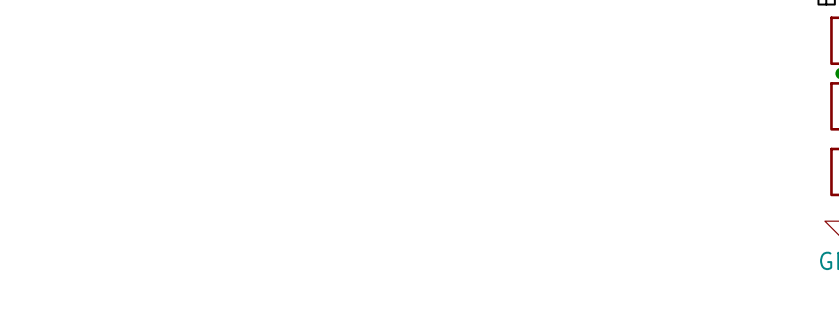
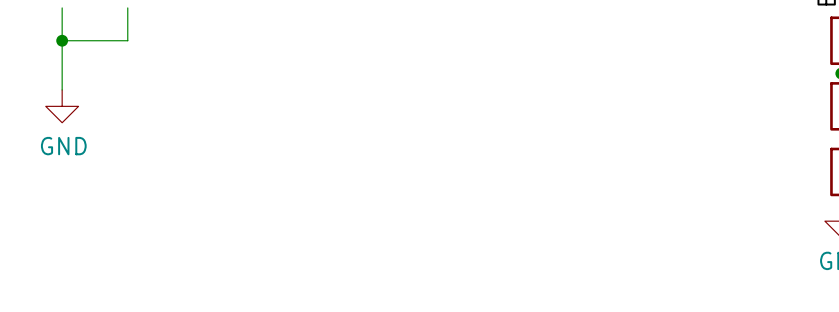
wire: none -> (62, 7) (62, 89)
wire: none -> (127, 7) (127, 40) (62, 40)
junction: none -> (62, 40)
power symbol: none -> GND (62, 106)

